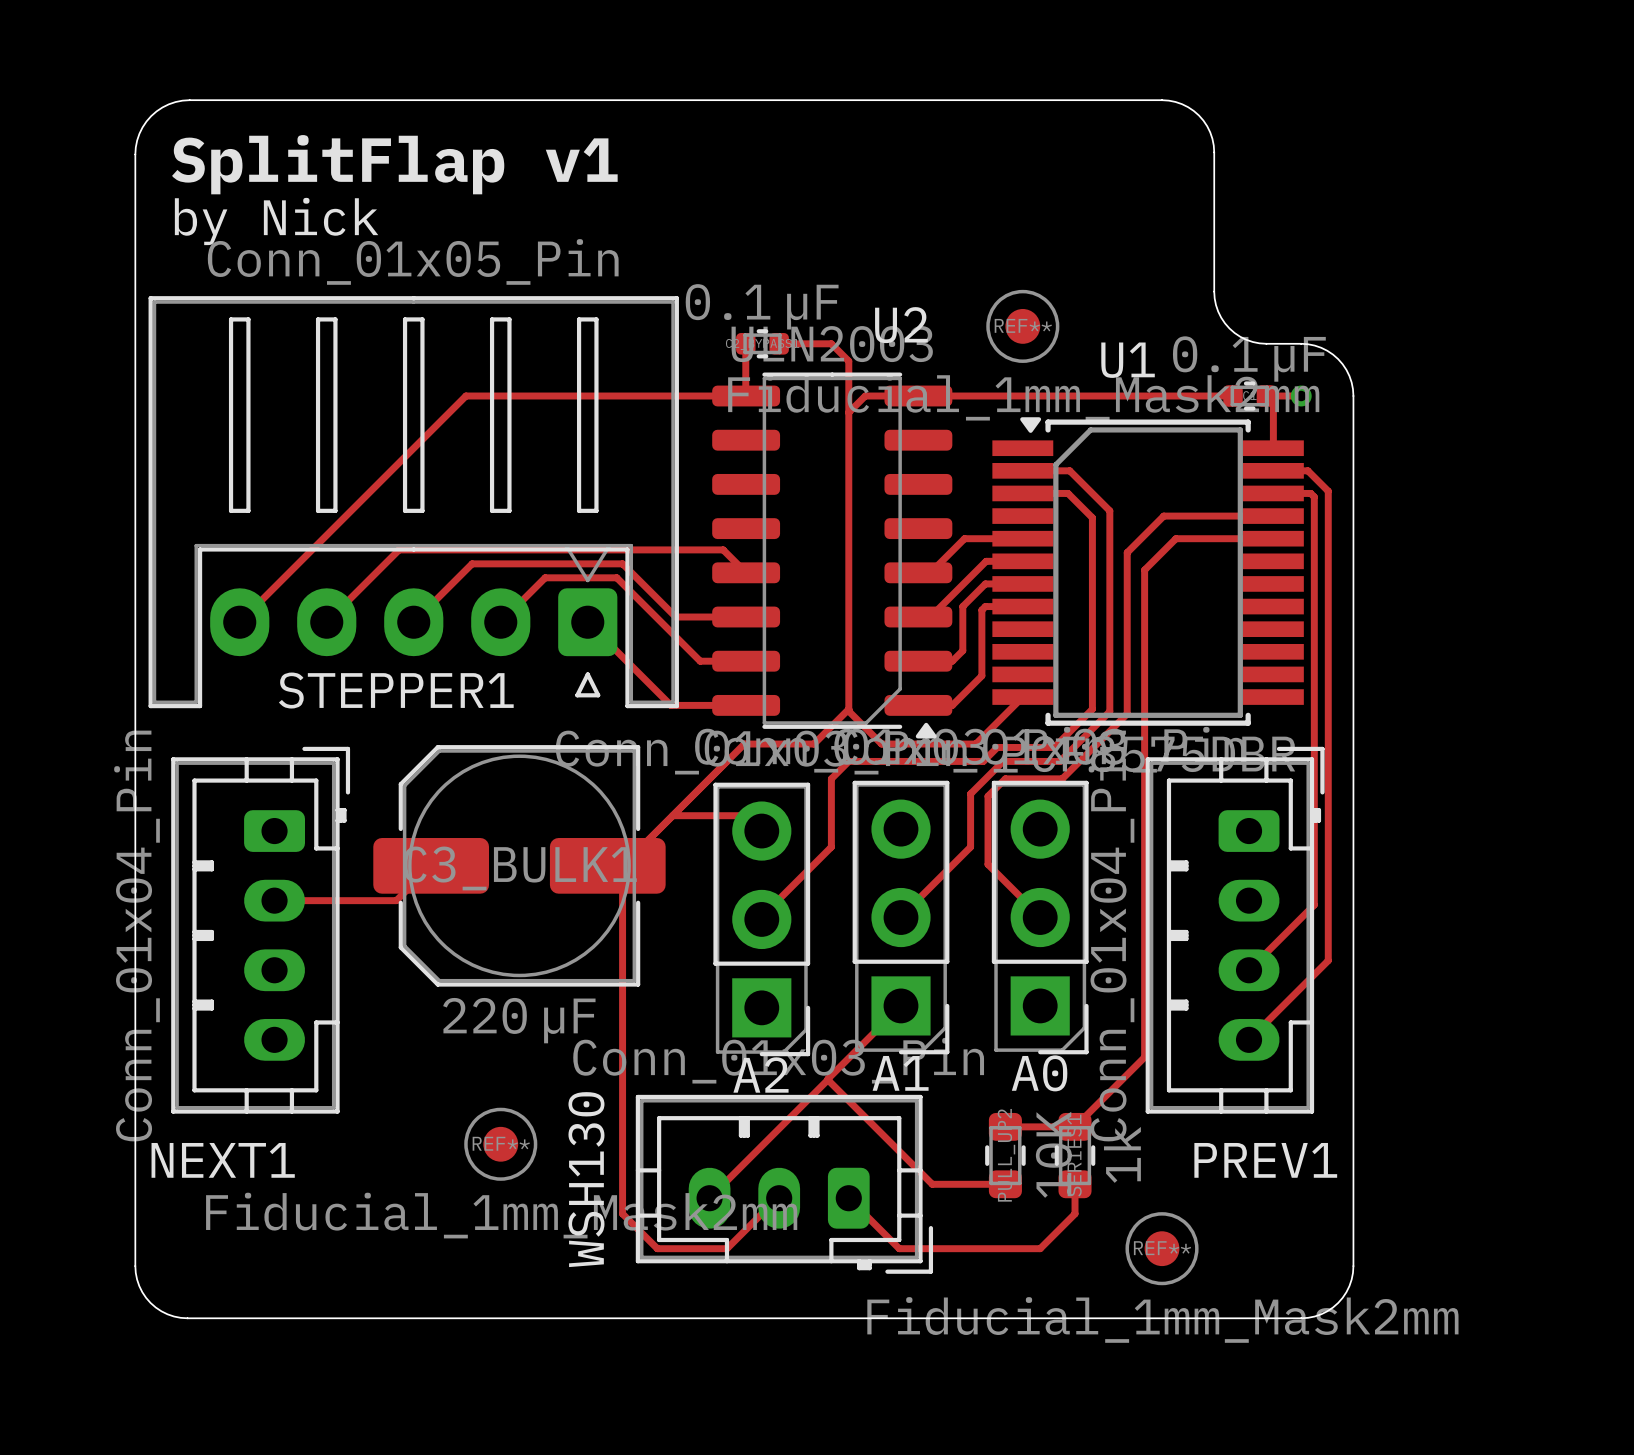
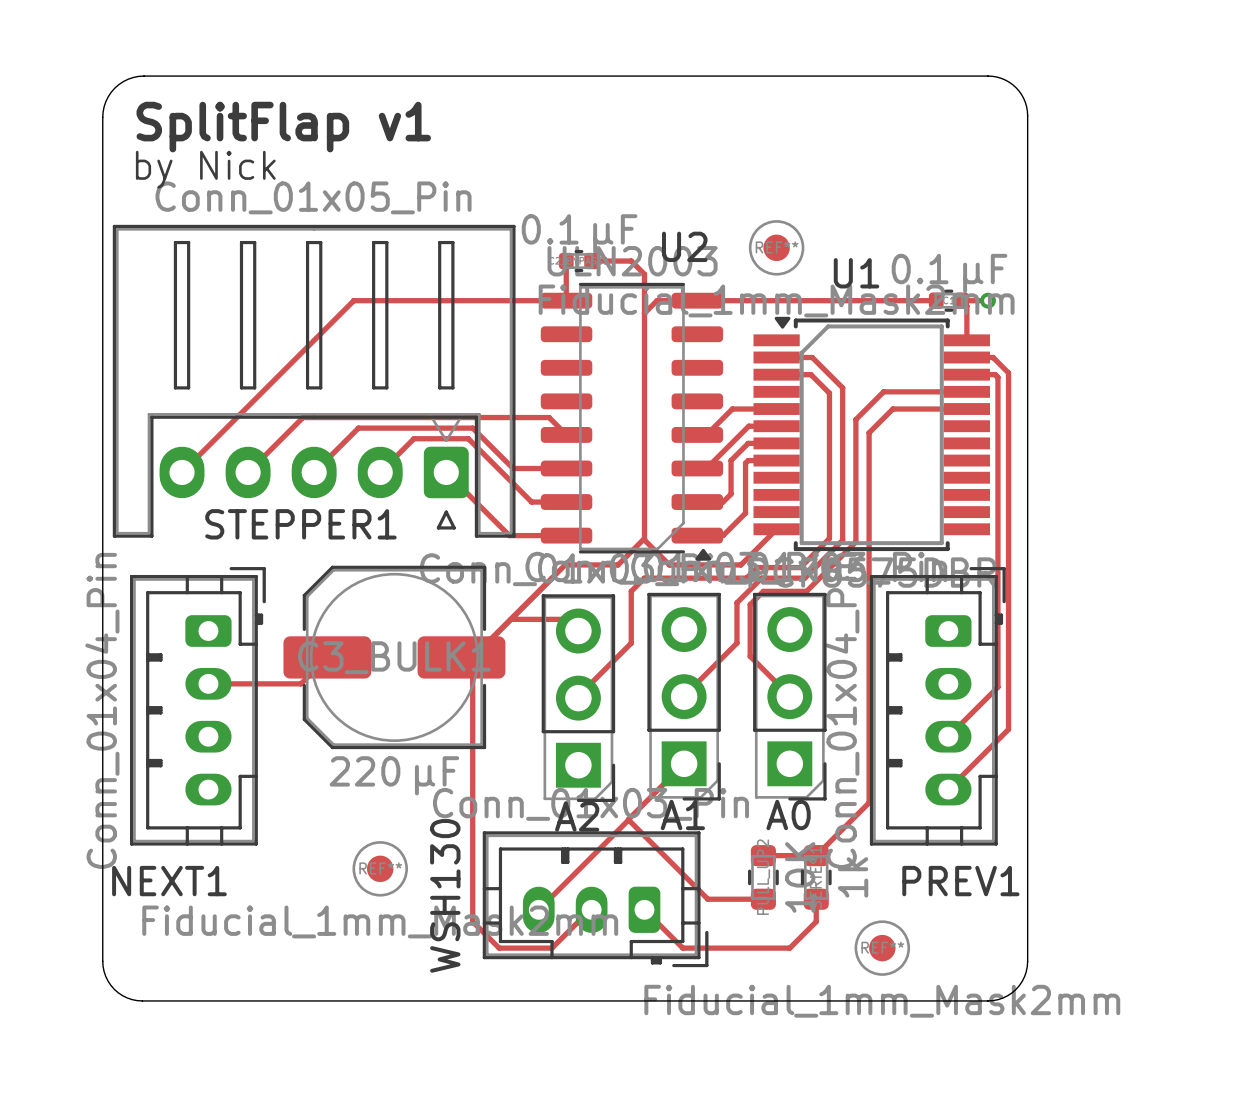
board edge: (1162, 100) (1182, 104) (1193, 110) (1203, 120) (1212, 138) (1214, 152) (1214, 291) (1216, 305) (1221, 317) (1234, 333) (1252, 342) (1308, 344) (1327, 350) (1338, 359) (1346, 369) (1351, 382) (1353, 396) -> (882, 76) (992, 76) (1009, 82) (1021, 94) (1027, 115) (1027, 300)

